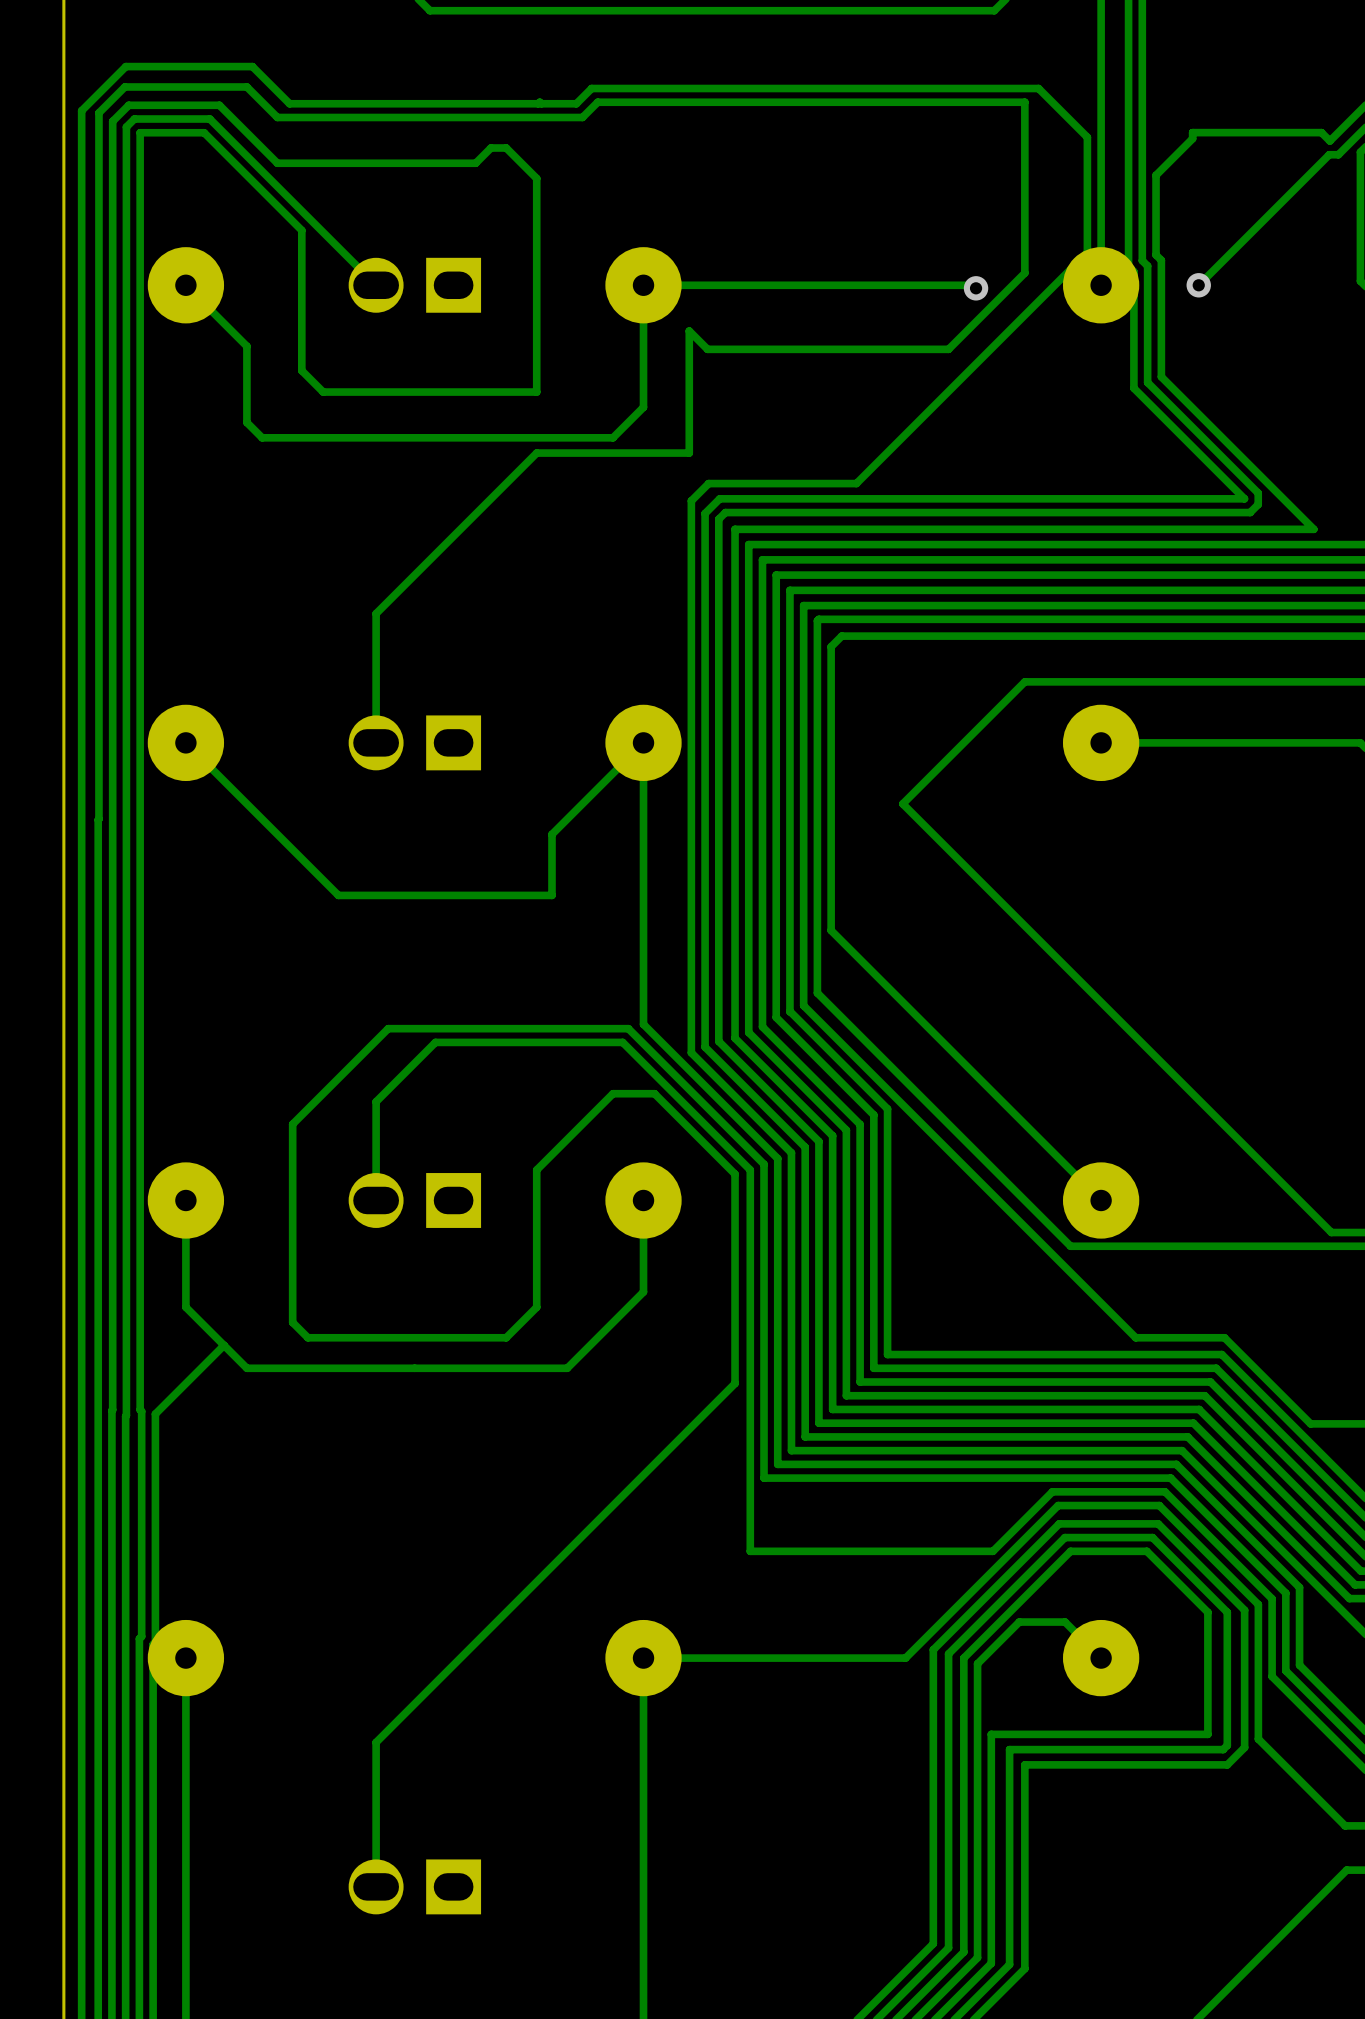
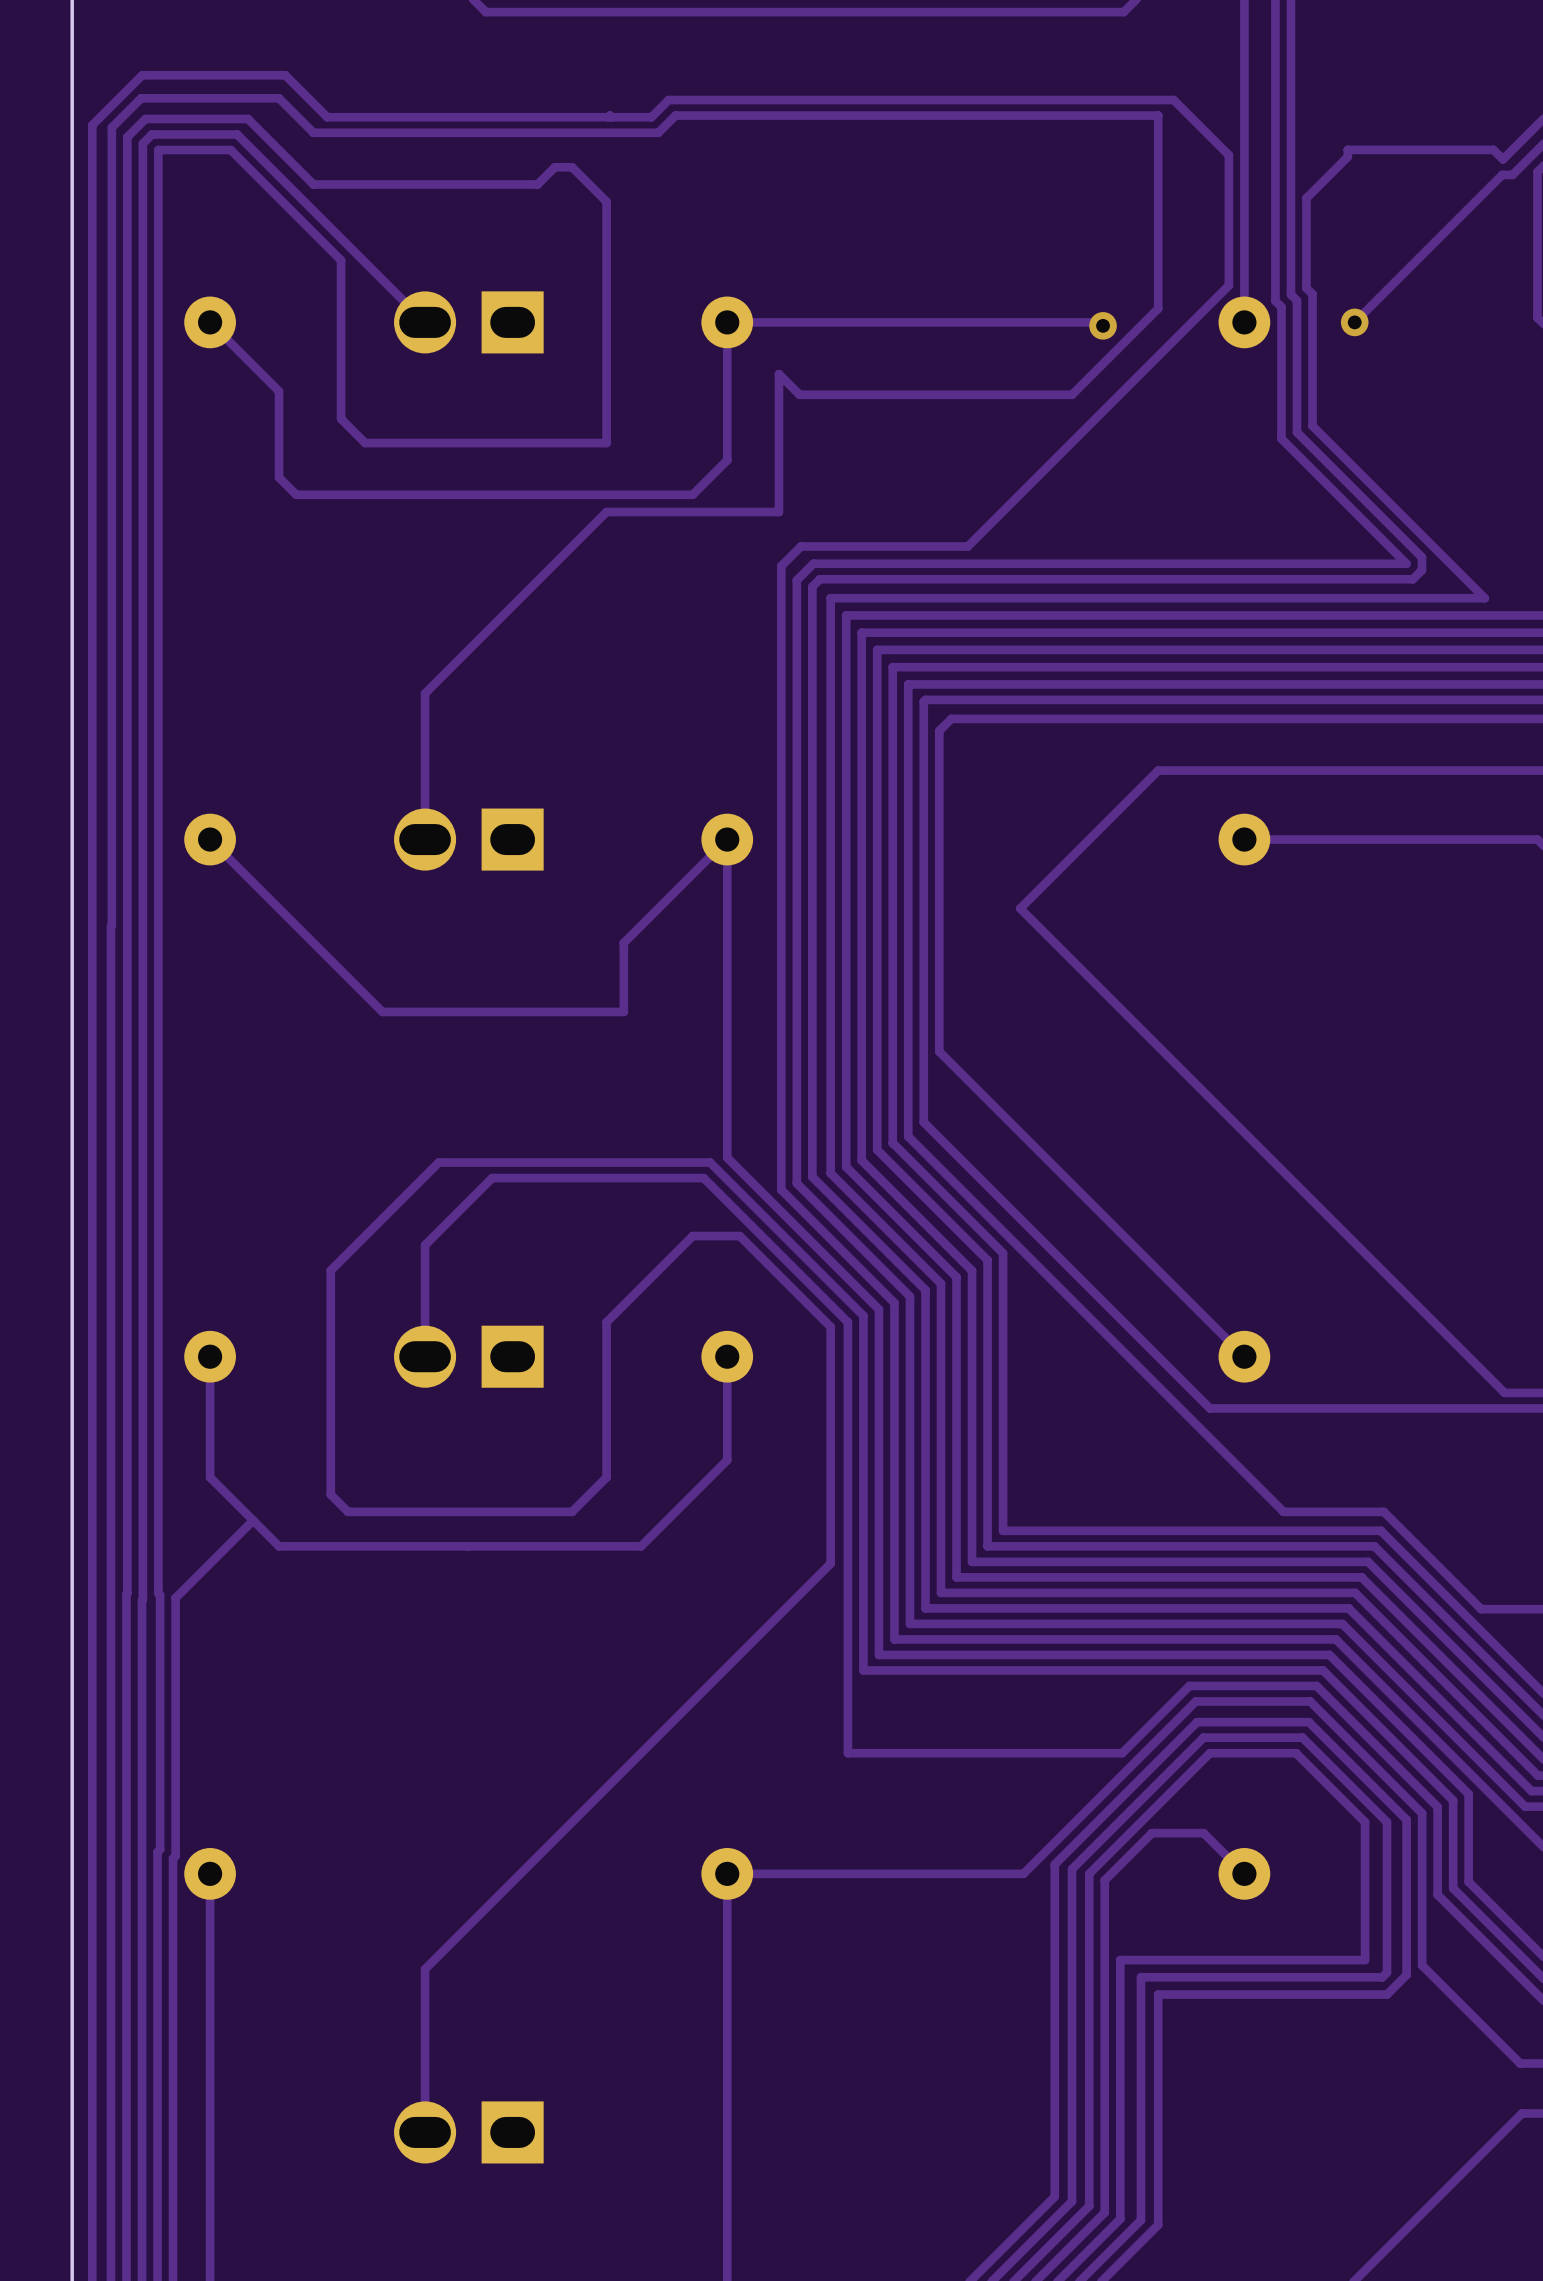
part footprint: [147, 247, 225, 324] -> [184, 296, 236, 349]
part footprint: [605, 247, 682, 324] -> [701, 296, 754, 349]
part footprint: [1062, 247, 1140, 324] -> [1218, 296, 1271, 349]
part footprint: [147, 704, 225, 782] -> [184, 813, 236, 866]
part footprint: [605, 704, 682, 782] -> [701, 813, 754, 866]
part footprint: [1062, 704, 1140, 782] -> [1218, 813, 1271, 866]
part footprint: [147, 1162, 225, 1239] -> [184, 1330, 236, 1383]
part footprint: [605, 1162, 682, 1239] -> [701, 1330, 754, 1383]
part footprint: [1062, 1162, 1140, 1239] -> [1218, 1330, 1271, 1383]
part footprint: [147, 1619, 225, 1697] -> [184, 1848, 236, 1900]
part footprint: [605, 1619, 682, 1697] -> [701, 1848, 754, 1900]
part footprint: [1062, 1619, 1140, 1697] -> [1218, 1848, 1271, 1900]

